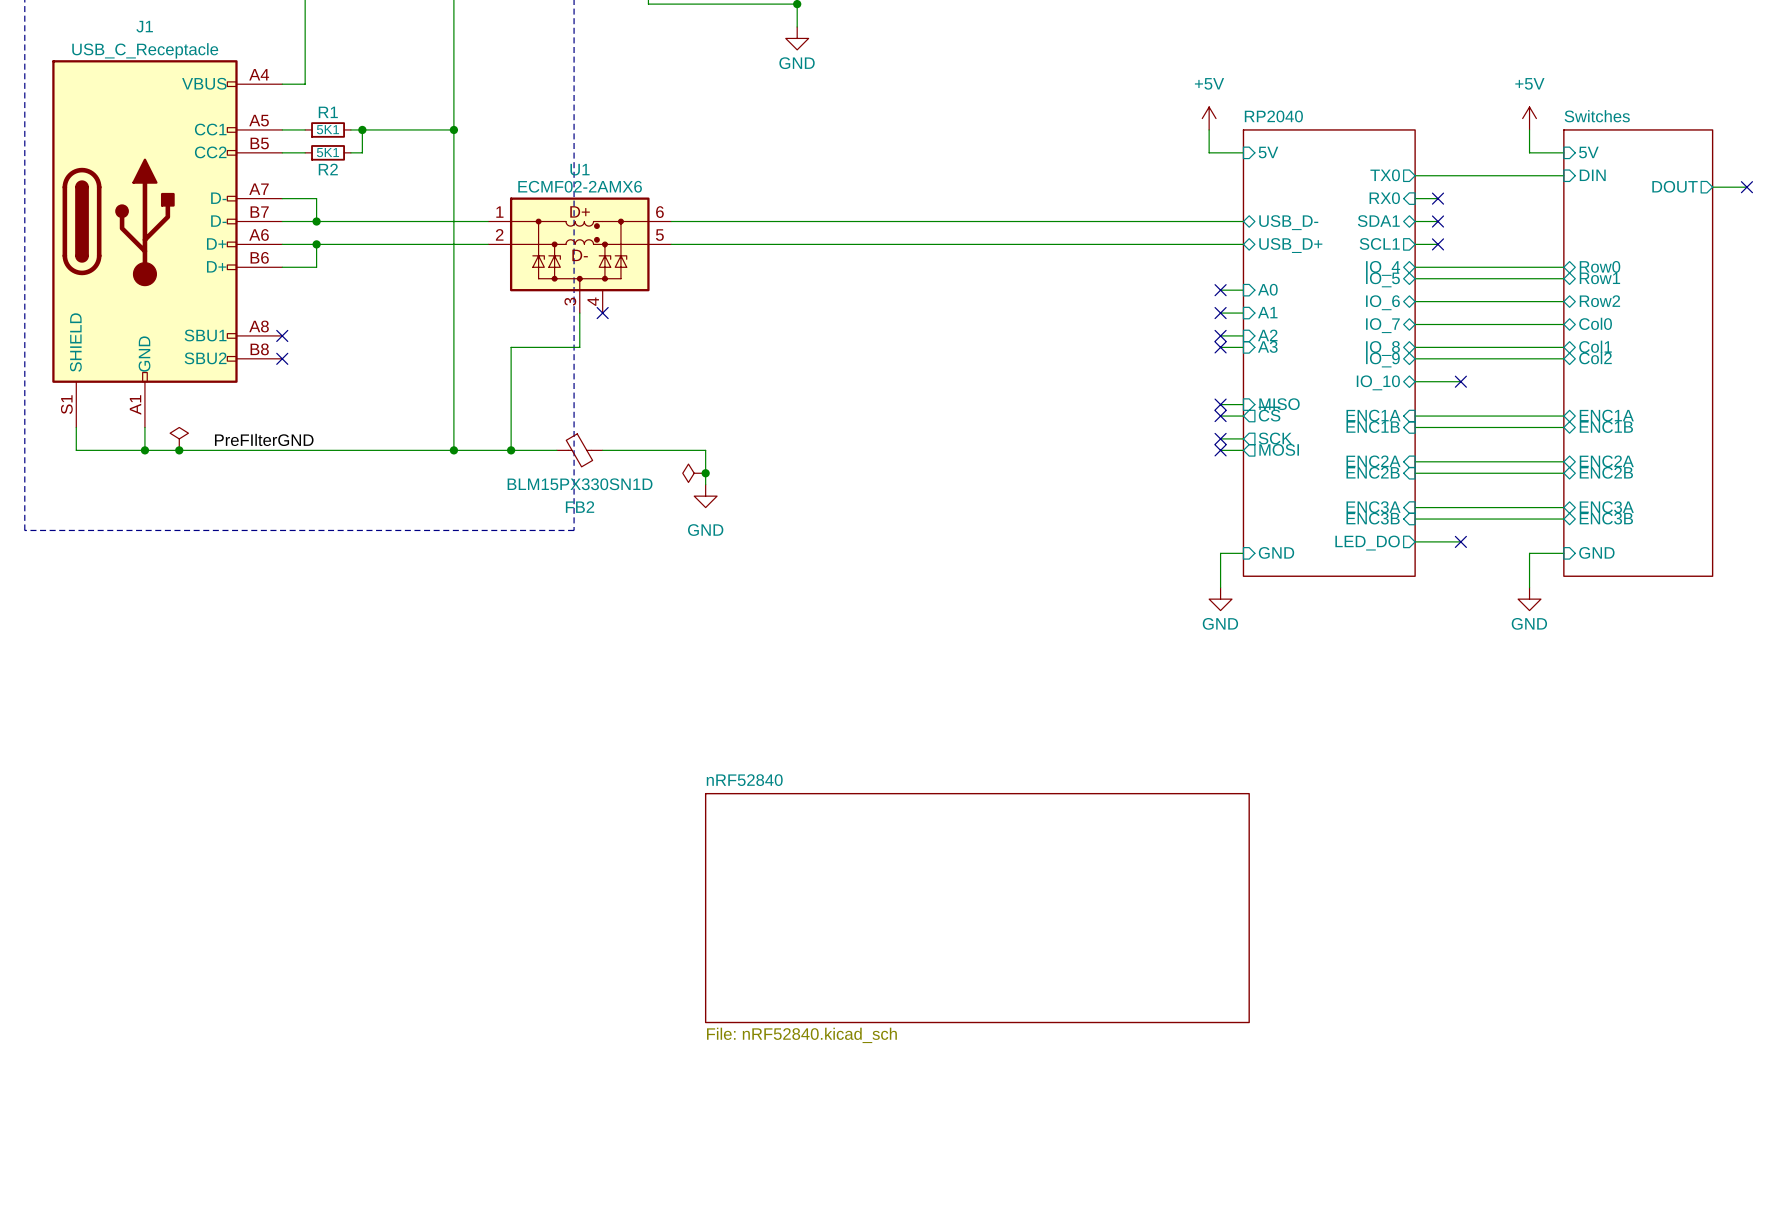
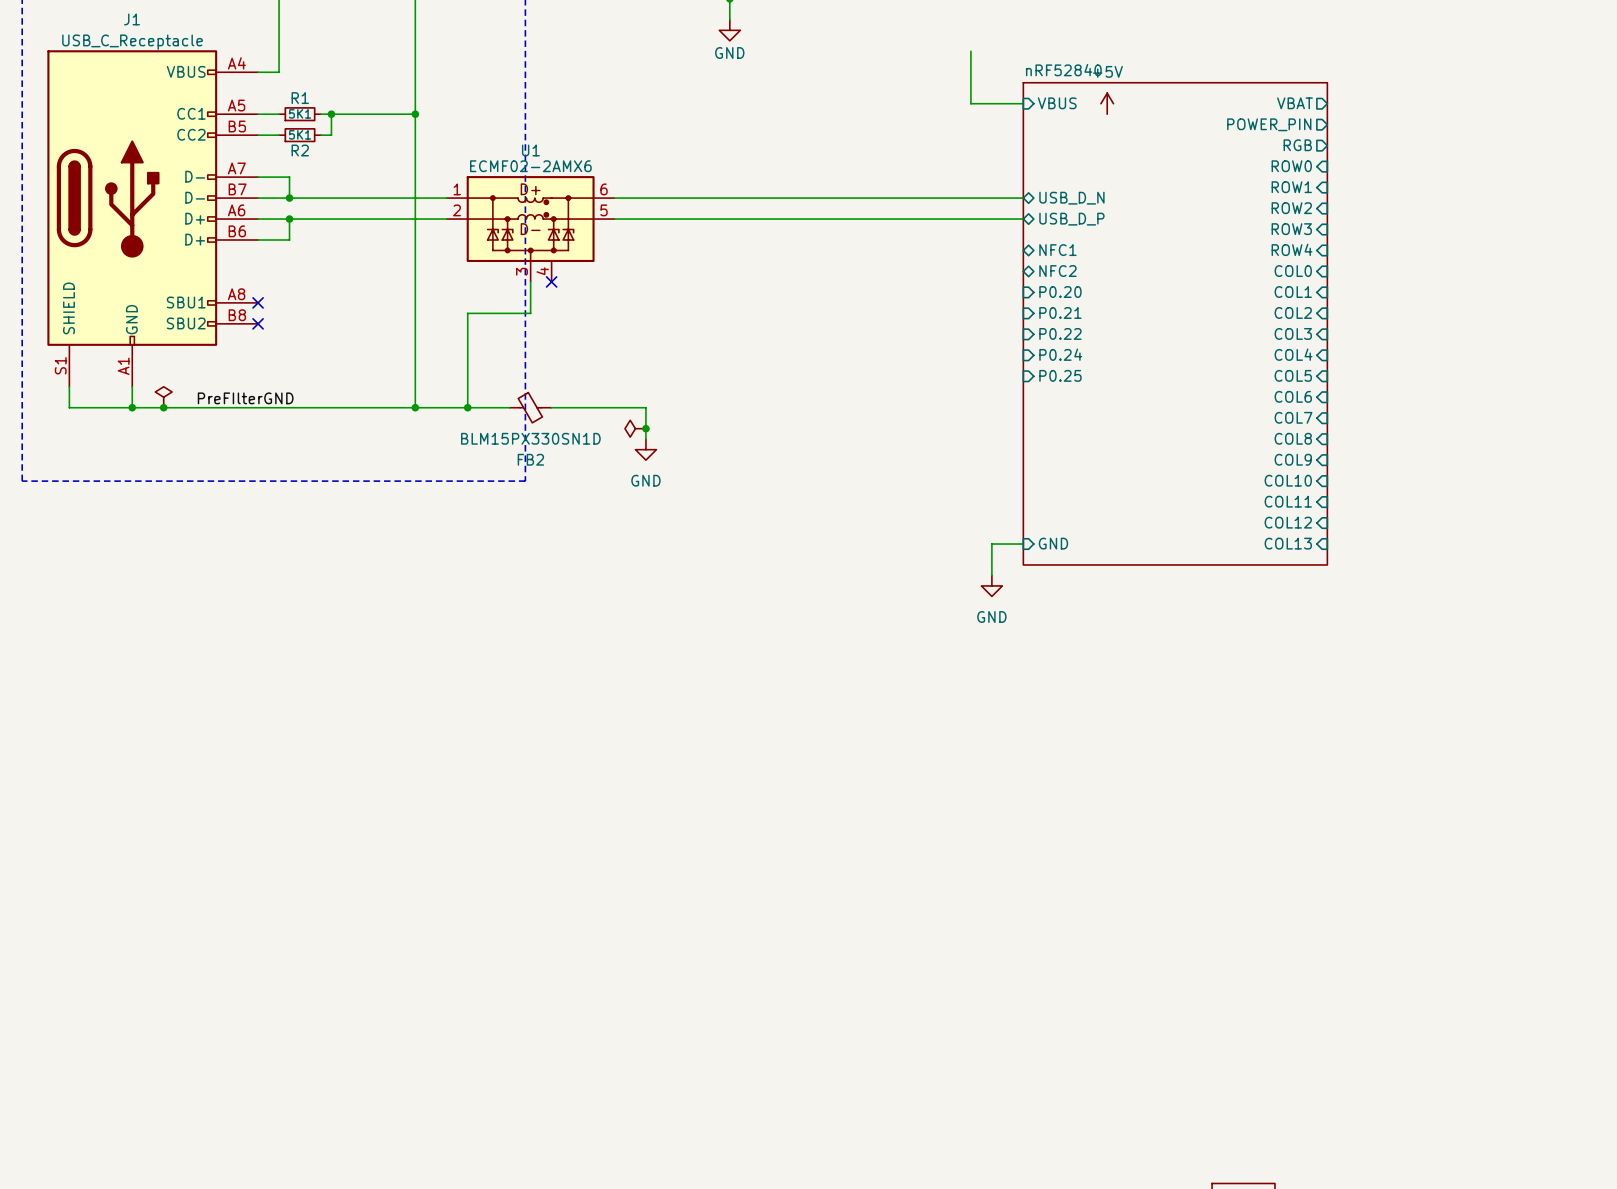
wire: none -> (970, 51) (970, 103) (1023, 103)
sheet pin: none -> VBUS (1057, 103)
sheet pin: none -> VBAT (1295, 103)
power symbol: +5V (1529, 118) -> none
wire: (1209, 129) (1209, 152) (1243, 152) -> none
wire: (1529, 129) (1529, 152) (1563, 152) -> none
sheet pin: none -> POWER_PIN (1269, 124)
sheet pin: 5V (1268, 152) -> none
sheet pin: 5V (1588, 152) -> none
sheet pin: none -> RGB (1297, 145)
sheet pin: TX0 (1385, 175) -> none
wire: (1415, 175) (1563, 175) -> none
sheet pin: DIN (1592, 175) -> none
sheet pin: none -> ROW0 (1291, 166)
sheet pin: DOUT (1675, 186) -> none
wire: (1712, 187) (1746, 187) -> none
no-connect mark: (1746, 187) -> none
sheet pin: RX0 (1384, 198) -> none
wire: (1415, 198) (1437, 198) -> none
no-connect mark: (1437, 198) -> none
sheet pin: none -> ROW1 (1291, 187)
wire: (1117, 221) (1243, 221) -> none
sheet pin: SDA1 (1378, 221) -> none
wire: (1415, 221) (1437, 221) -> none
no-connect mark: (1437, 221) -> none
sheet pin: none -> USB_D_N (1071, 198)
sheet pin: USB_D- (1288, 222) -> none
sheet pin: none -> ROW2 (1291, 208)
sheet pin: SCL1 (1379, 243) -> none
wire: (1117, 244) (1243, 244) -> none
wire: (1415, 244) (1437, 244) -> none
no-connect mark: (1437, 244) -> none
sheet pin: none -> USB_D_P (1071, 219)
sheet pin: USB_D+ (1290, 245) -> none
sheet pin: none -> ROW3 (1291, 229)
sheet pin: Row0 (1600, 266) -> none
wire: (1415, 267) (1563, 267) -> none
sheet pin: IO_4 (1383, 268) -> none
sheet pin: none -> NFC1 (1057, 250)
sheet pin: none -> ROW4 (1292, 249)
wire: (1415, 278) (1563, 278) -> none
sheet pin: Row1 (1599, 278) -> none
sheet pin: IO_5 (1382, 279) -> none
sheet pin: A0 (1267, 289) -> none
wire: (1220, 290) (1243, 290) -> none
no-connect mark: (1220, 290) -> none
sheet pin: none -> NFC2 (1057, 271)
sheet pin: none -> COL0 (1293, 271)
wire: (1415, 301) (1563, 301) -> none
sheet pin: Row2 (1599, 301) -> none
sheet pin: IO_6 (1382, 302) -> none
sheet pin: A1 (1267, 312) -> none
wire: (1220, 313) (1243, 313) -> none
no-connect mark: (1220, 313) -> none
sheet pin: Col0 (1595, 323) -> none
sheet pin: none -> P0.20 (1060, 292)
sheet pin: none -> COL1 (1293, 292)
wire: (1415, 324) (1563, 324) -> none
sheet pin: IO_7 (1382, 325) -> none
wire: (1220, 335) (1243, 335) -> none
no-connect mark: (1220, 335) -> none
sheet pin: A2 (1267, 335) -> none
sheet pin: none -> P0.21 (1060, 312)
sheet pin: A3 (1267, 346) -> none
sheet pin: none -> COL2 (1293, 312)
sheet pin: Col1 (1595, 346) -> none
wire: (1220, 347) (1243, 347) -> none
no-connect mark: (1220, 347) -> none
wire: (1415, 347) (1563, 347) -> none
sheet pin: IO_8 (1382, 348) -> none
sheet RP2040: (1329, 353) -> none
sheet Switches: (1638, 353) -> none
wire: (1415, 358) (1563, 358) -> none
sheet pin: Col2 (1595, 358) -> none
sheet pin: IO_9 (1382, 359) -> none
sheet pin: none -> P0.22 (1060, 333)
sheet pin: none -> COL3 (1293, 333)
wire: (1415, 381) (1460, 381) -> none
no-connect mark: (1460, 381) -> none
sheet pin: IO_10 (1378, 382) -> none
sheet pin: none -> P0.24 (1060, 354)
sheet pin: none -> COL4 (1293, 354)
wire: (1220, 404) (1243, 404) -> none
no-connect mark: (1220, 404) -> none
sheet pin: MISO (1279, 404) -> none
sheet pin: ~{CS} (1269, 414) -> none
sheet pin: none -> P0.25 (1060, 375)
sheet pin: ENC1A (1373, 415) -> none
sheet pin: none -> COL5 (1293, 375)
sheet pin: ENC1A (1606, 415) -> none
wire: (1220, 416) (1243, 416) -> none
no-connect mark: (1220, 416) -> none
wire: (1415, 416) (1563, 416) -> none
sheet pin: ENC1B (1373, 427) -> none
wire: (1415, 427) (1563, 427) -> none
sheet pin: ENC1B (1606, 427) -> none
wire: (1220, 438) (1243, 438) -> none
no-connect mark: (1220, 438) -> none
sheet pin: SCK (1275, 438) -> none
sheet pin: none -> COL6 (1293, 396)
sheet pin: MOSI (1279, 449) -> none
wire: (1220, 450) (1243, 450) -> none
no-connect mark: (1220, 450) -> none
sheet pin: ENC2A (1373, 461) -> none
sheet pin: none -> COL7 (1293, 417)
wire: (1415, 461) (1563, 461) -> none
sheet pin: ENC2A (1606, 461) -> none
sheet pin: ENC2B (1373, 472) -> none
sheet pin: ENC2B (1606, 472) -> none
wire: (1415, 473) (1563, 473) -> none
sheet pin: none -> COL8 (1293, 438)
sheet pin: ENC3A (1373, 507) -> none
sheet pin: none -> COL9 (1293, 459)
wire: (1415, 507) (1563, 507) -> none
sheet pin: ENC3A (1606, 507) -> none
sheet pin: ENC3B (1373, 518) -> none
sheet pin: ENC3B (1606, 518) -> none
wire: (1415, 519) (1563, 519) -> none
sheet pin: none -> COL10 (1288, 480)
wire: (1415, 541) (1460, 541) -> none
no-connect mark: (1460, 541) -> none
sheet pin: LED_DO (1367, 543) -> none
sheet pin position: GND (1276, 552) -> GND (1053, 543)
sheet pin: none -> COL11 (1288, 501)
sheet pin: GND (1596, 552) -> none
wire: (1243, 553) (1220, 553) (1220, 587) -> none
wire: (1563, 553) (1529, 553) (1529, 587) -> none
sheet pin: none -> COL12 (1288, 522)
sheet pin: none -> COL13 (1288, 543)
wire: none -> (1023, 544) (991, 544) (991, 575)
power symbol position: GND (1220, 599) -> GND (991, 585)
power symbol: GND (1529, 599) -> none
power symbol text position: GND (1220, 623) -> GND (991, 617)
sheet nRF52840 name position: nRF52840 (744, 780) -> nRF52840 (1063, 70)
sheet nRF52840 shape: [704, 792, 1250, 1024] -> [1022, 82, 1328, 566]
sheet nRF52840 value: File: nRF52840.kicad_sch (801, 1035) -> none

